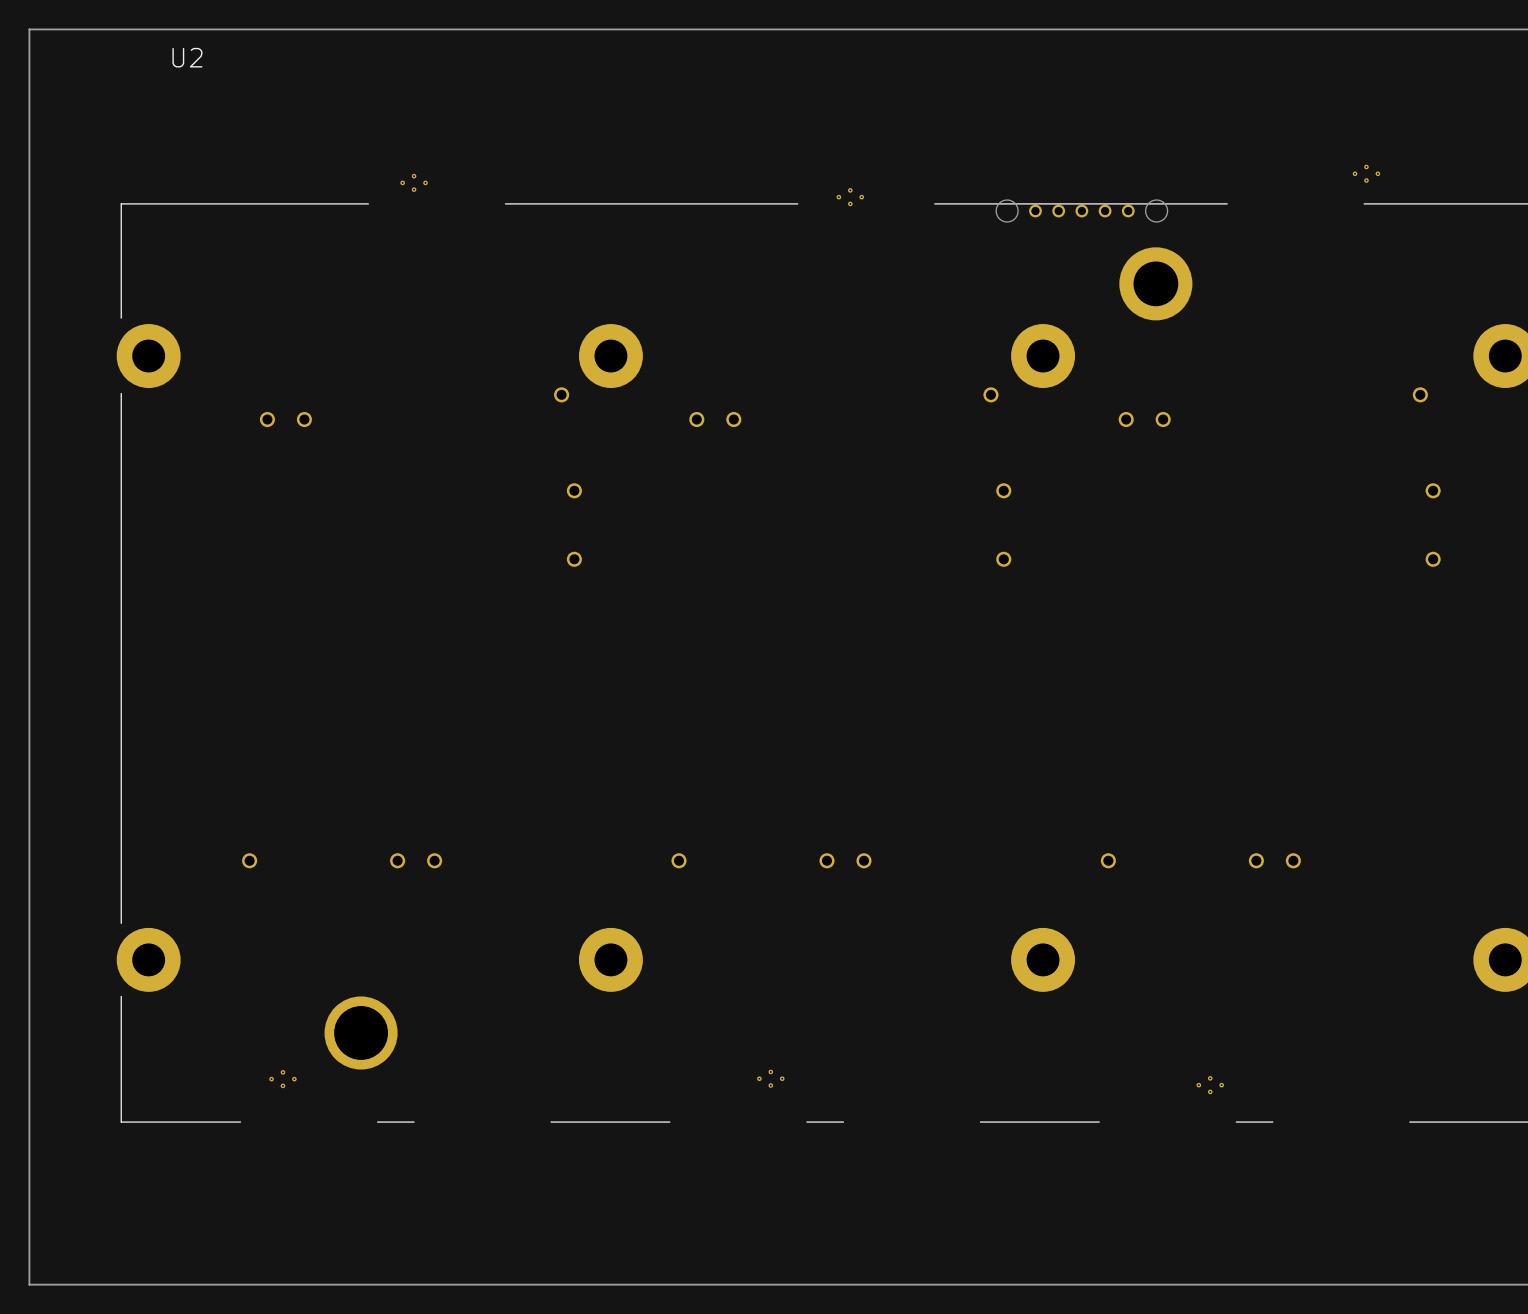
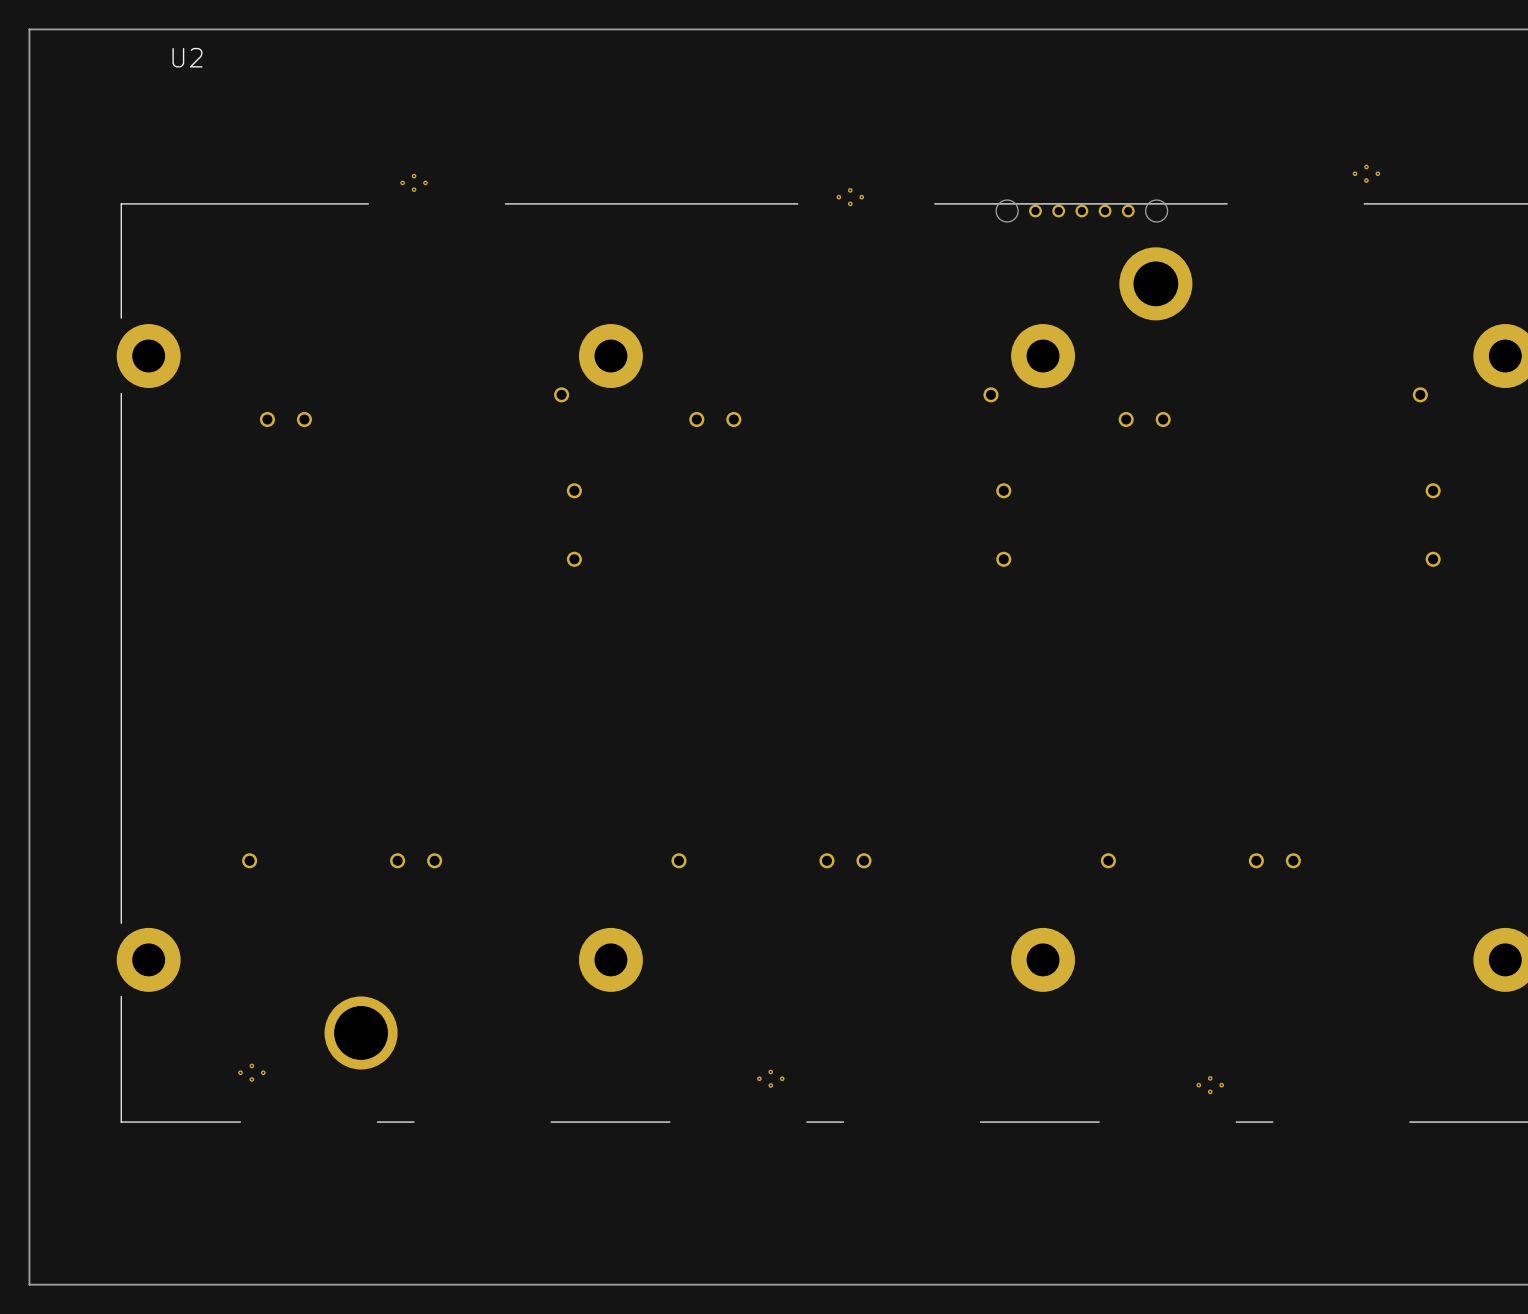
part position: (282, 1079) -> (251, 1072)

